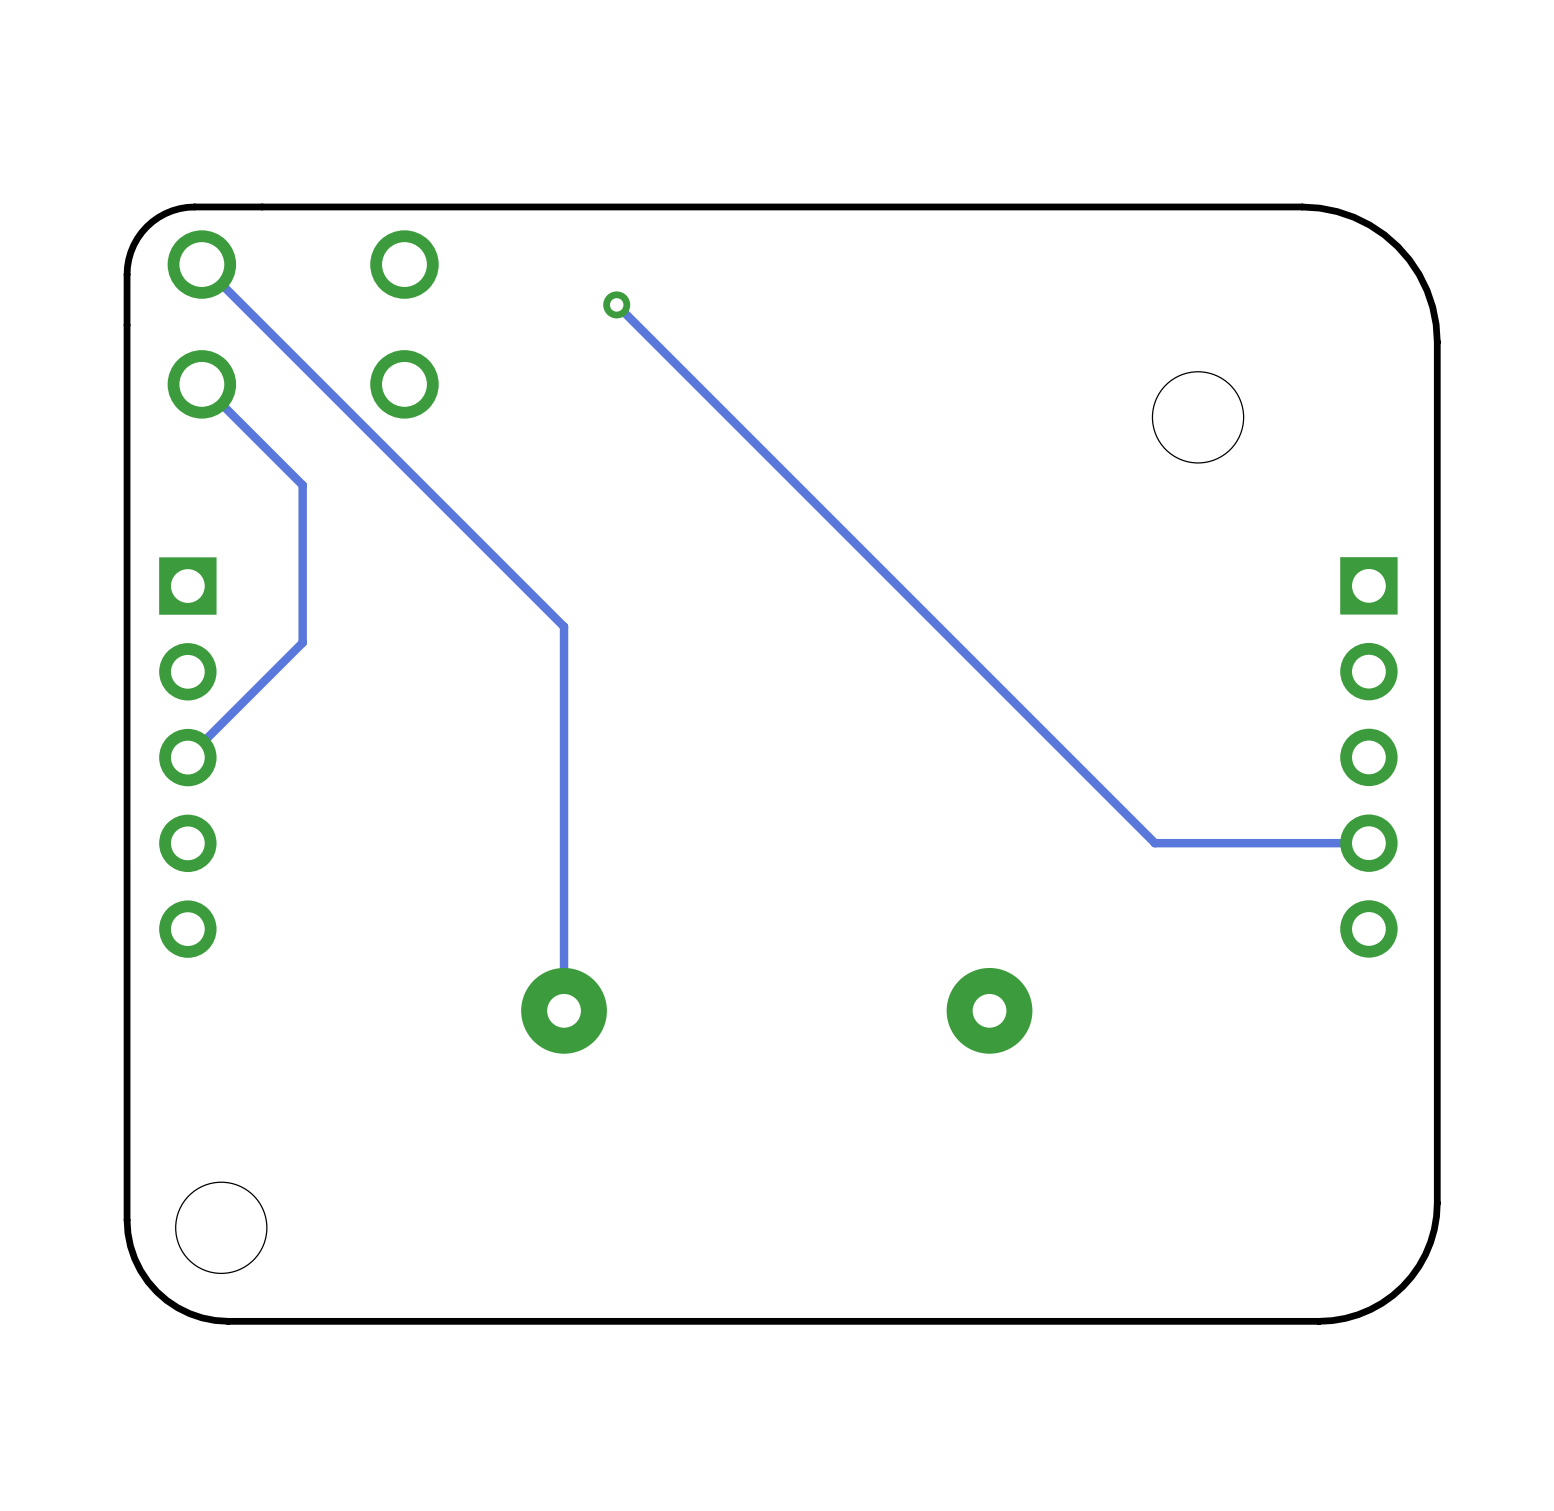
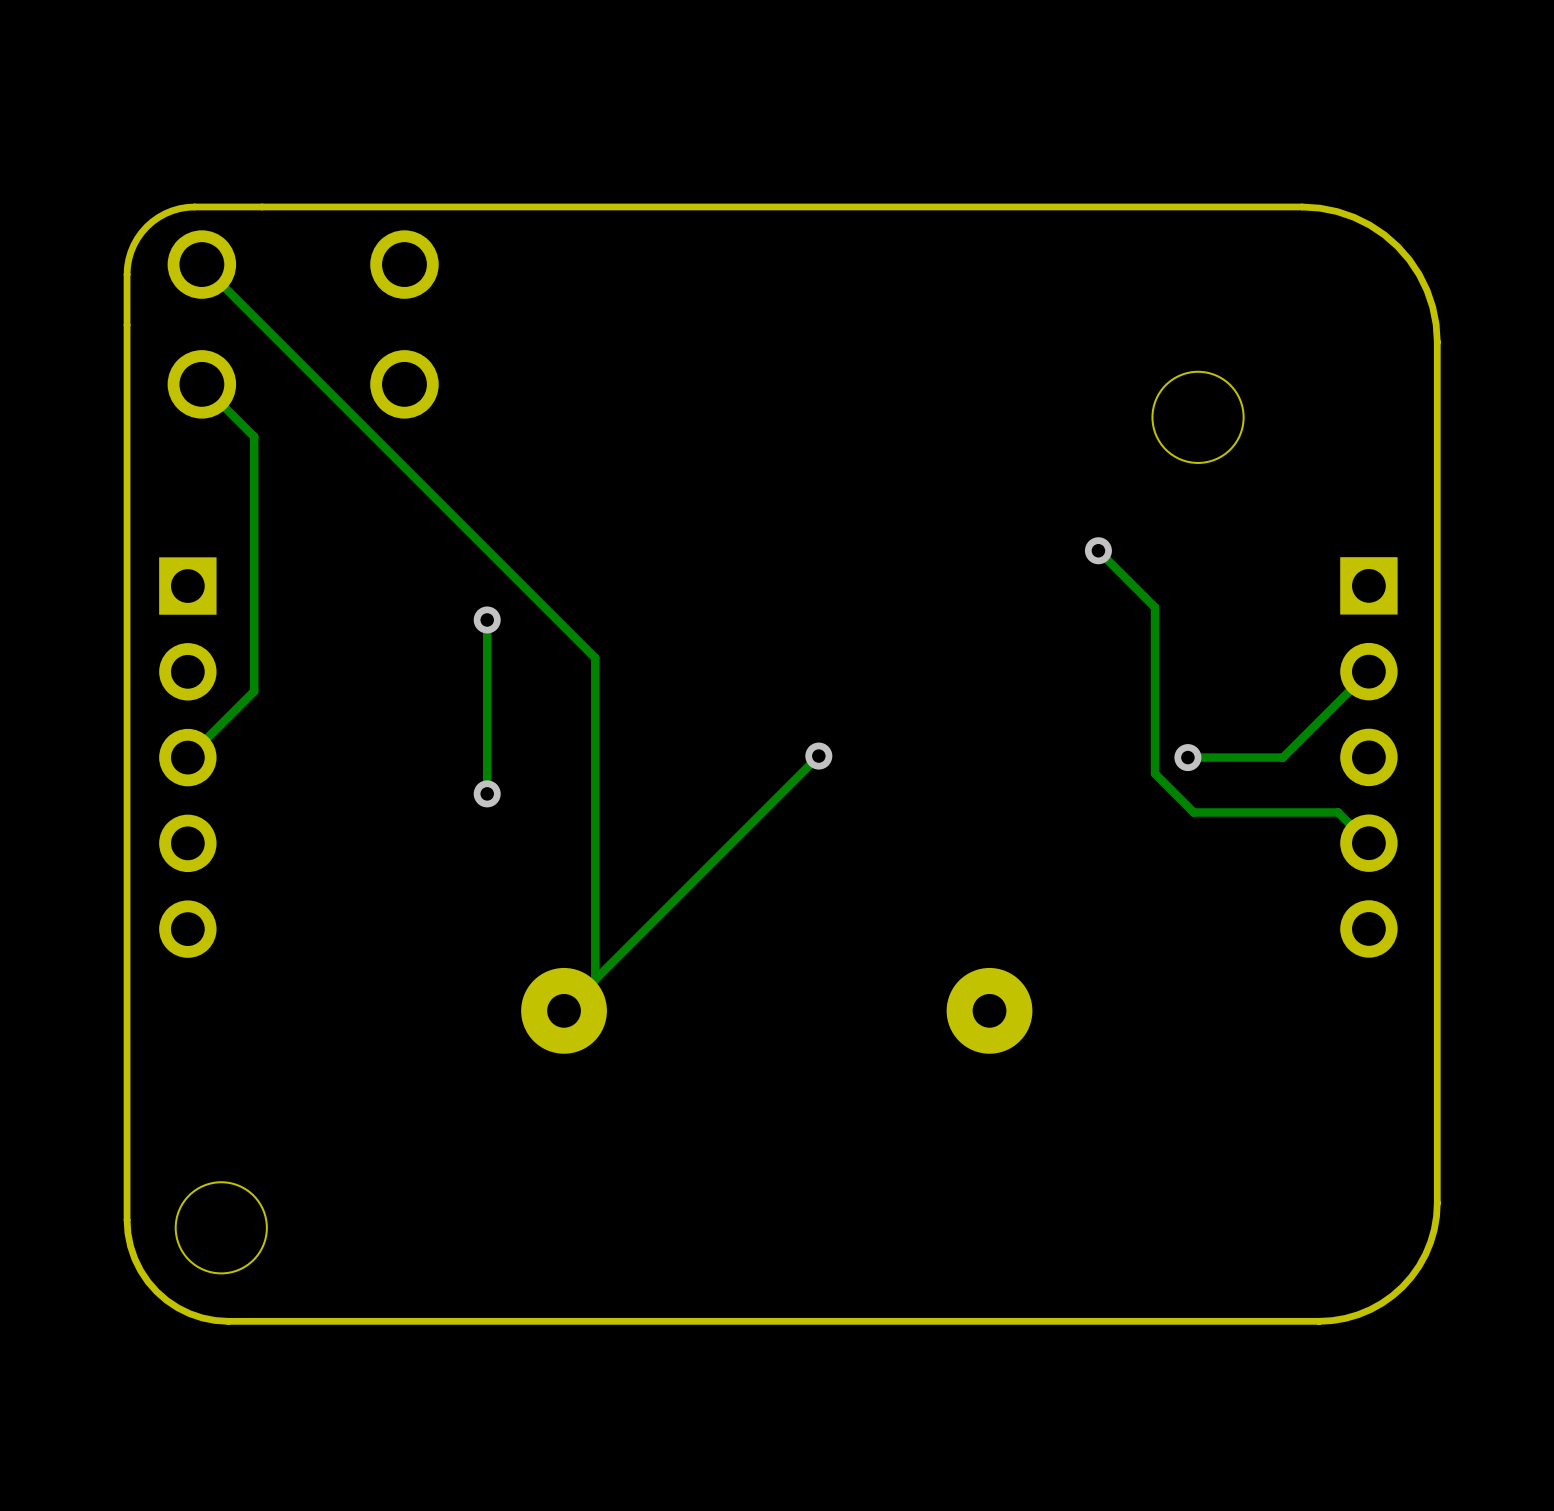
track: (616, 304) (1154, 843) (1368, 843) -> (1098, 550) (1154, 607) (1154, 773) (1193, 812) (1338, 812) (1368, 843)
via: (616, 304) -> none
track: (254, 436) (302, 485) (302, 642) (254, 691) -> (254, 436) (254, 691)
via: none -> (1098, 550)
track: none -> (487, 619) (487, 793)
via: none -> (487, 619)
track: (564, 626) (564, 1010) -> (564, 626) (595, 657) (595, 979)
track: none -> (1368, 671) (1282, 757) (1187, 757)
track: none -> (818, 756) (564, 1010)
via: none -> (818, 756)
via: none -> (1187, 757)
via: none -> (487, 793)

